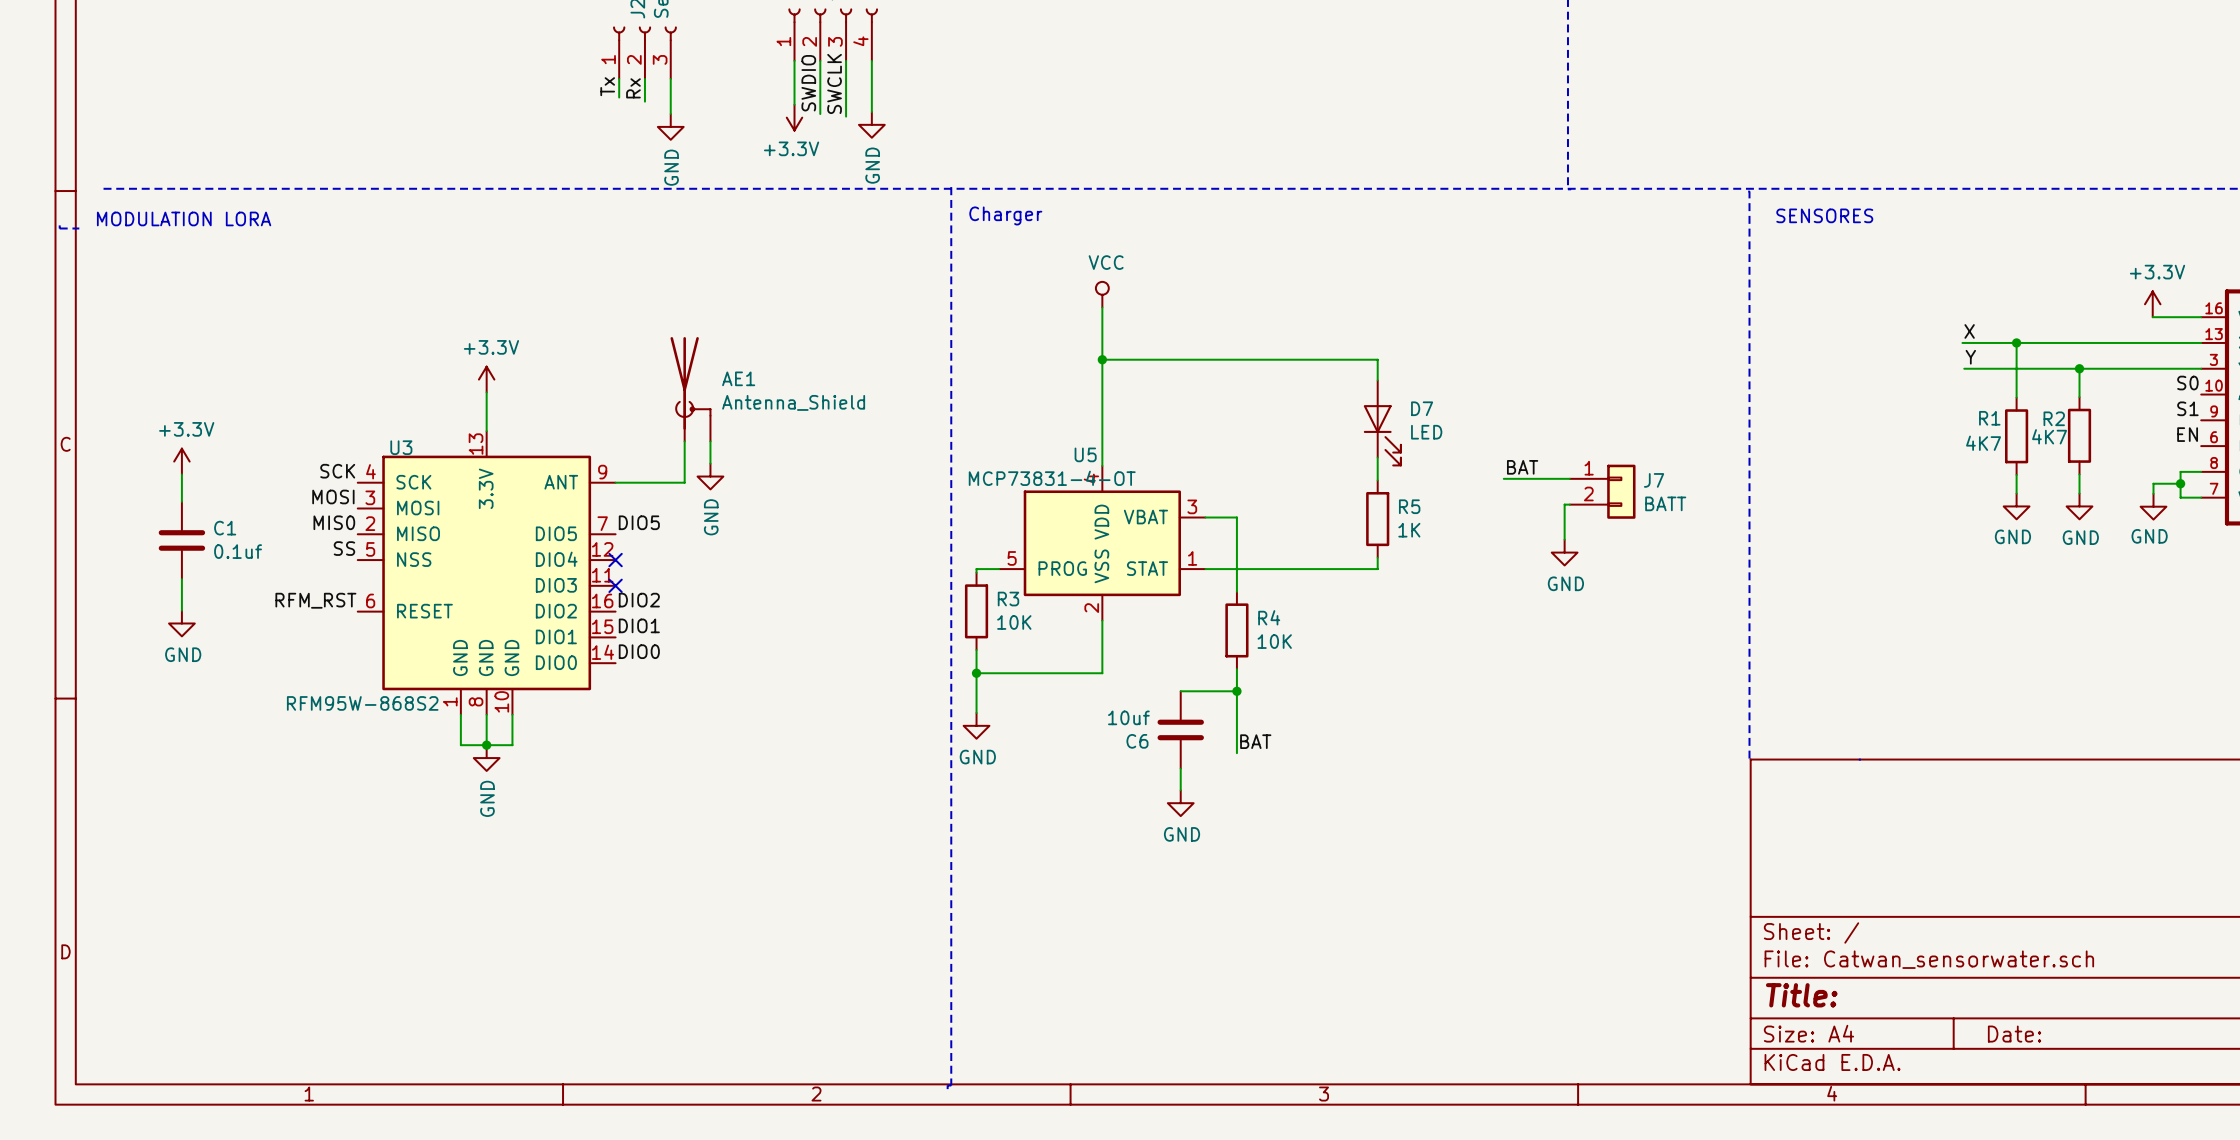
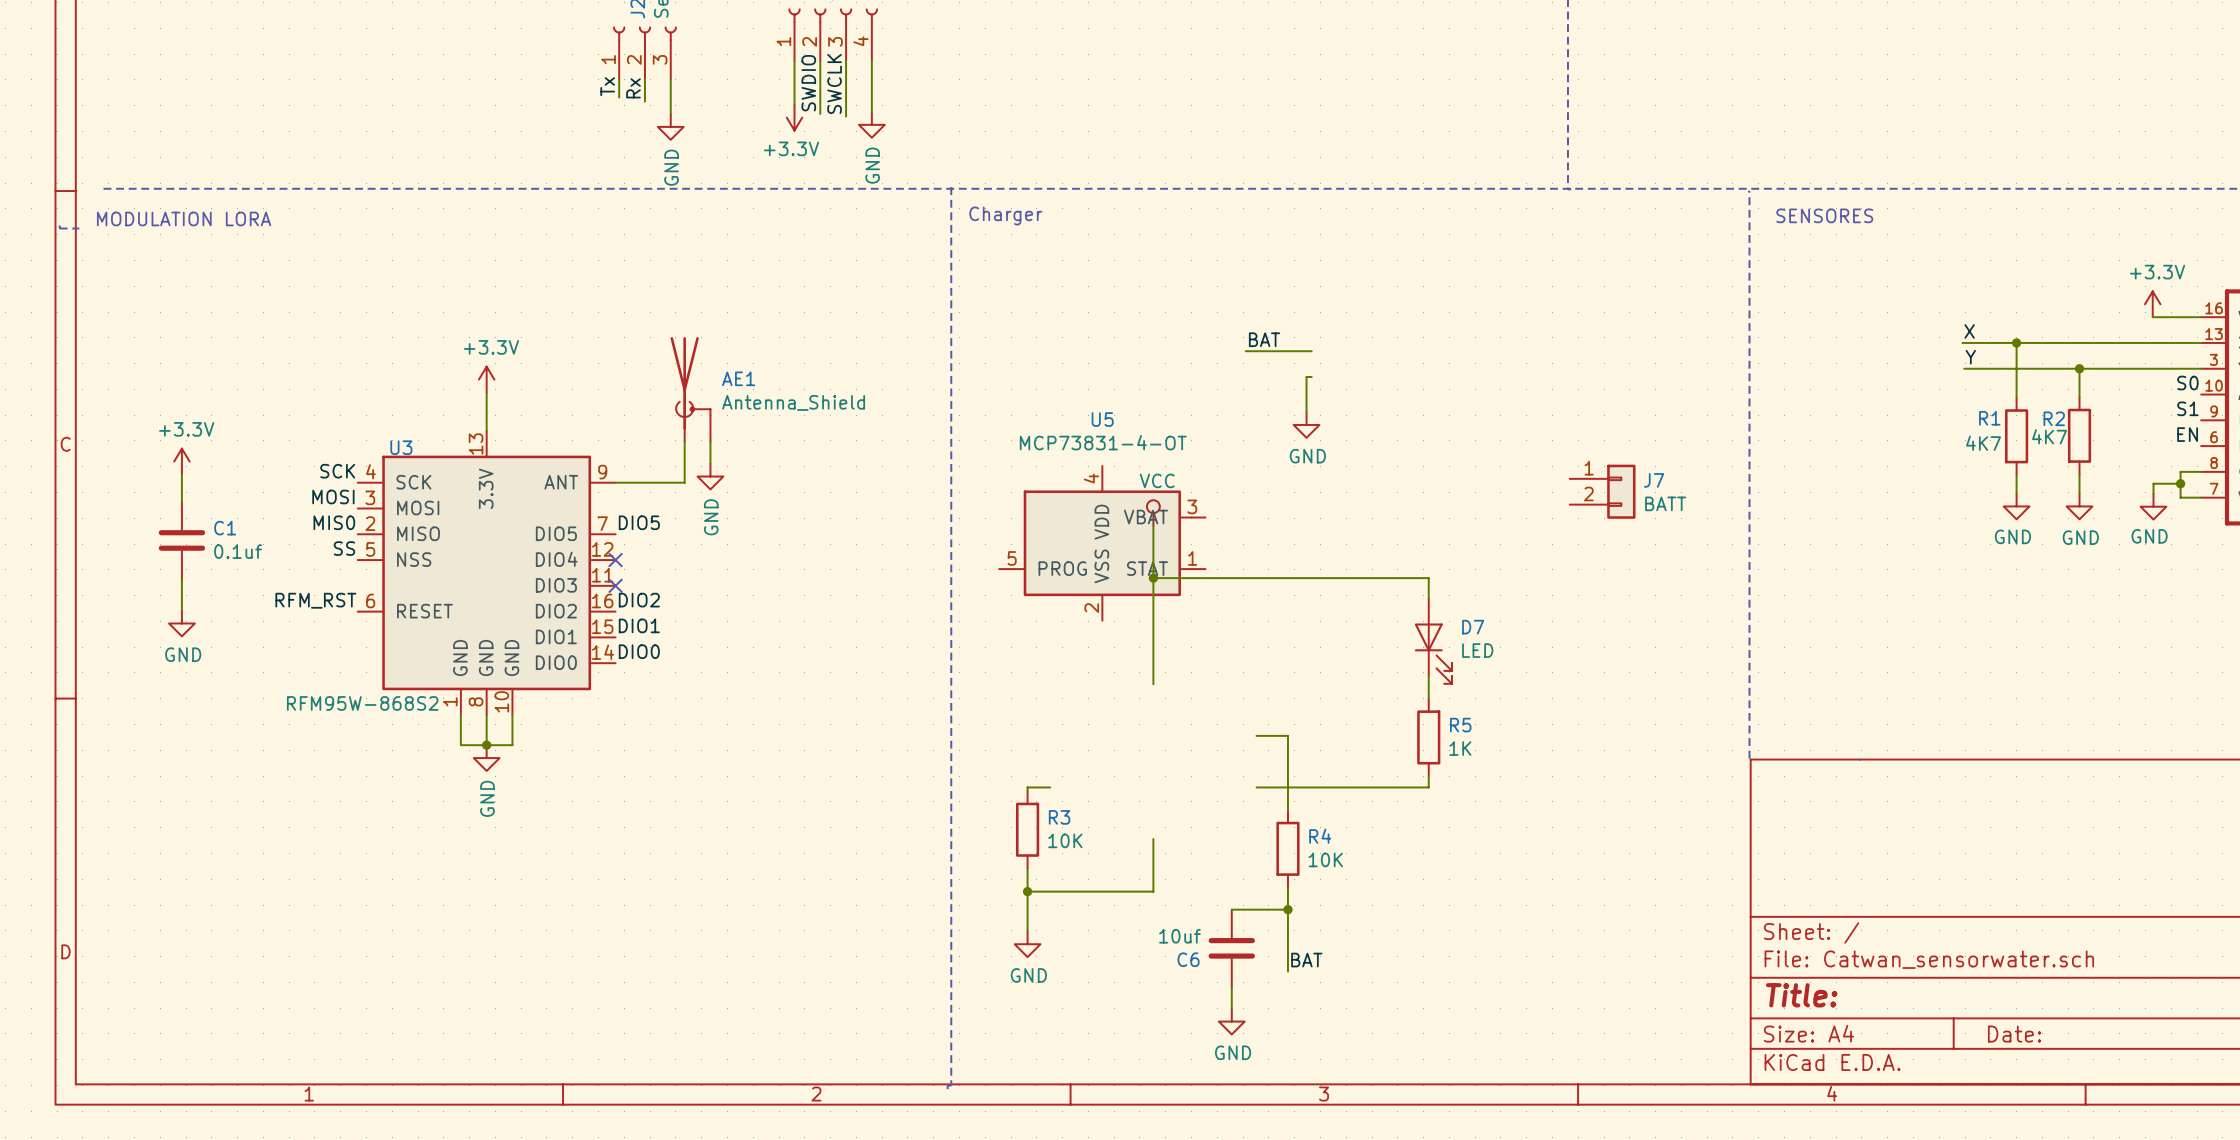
power symbol position: VCC (1102, 294) -> VCC (1153, 513)
wire: (1102, 307) (1102, 465) -> (1153, 526) (1153, 684)
label: none -> BAT (1264, 339)
wire: none -> (1245, 351) (1311, 351)
wire: (1102, 359) (1377, 359) (1377, 380) -> (1153, 578) (1428, 578) (1428, 598)
junction: (1102, 359) -> none
wire: none -> (1311, 377) (1306, 377) (1306, 412)
D7 position: (1382, 422) -> (1433, 641)
power symbol: none -> GND (1306, 424)
U5 name position: U5 (1085, 454) -> U5 (1102, 419)
wire: (1377, 457) (1377, 480) -> (1428, 676) (1428, 698)
label: BAT (1522, 467) -> none
U5 value position: MCP73831-4-OT (1052, 478) -> MCP73831-4-OT (1103, 442)
wire: (1503, 478) (1569, 478) -> none
wire: (1569, 504) (1564, 504) (1564, 539) -> none
wire: (1205, 517) (1236, 517) (1236, 591) -> (1256, 735) (1287, 735) (1287, 810)
R5 position: (1377, 519) -> (1428, 737)
power symbol: GND (1564, 552) -> none
wire: (1377, 557) (1377, 569) (1205, 569) -> (1428, 776) (1428, 787) (1256, 787)
wire: (999, 569) (976, 569) (976, 572) -> (1050, 787) (1027, 787) (1027, 791)
junction: none -> (1153, 578)
R3 position: (976, 611) -> (1027, 829)
wire: (1102, 620) (1102, 673) (976, 673) -> (1153, 839) (1153, 891) (1027, 891)
R4 position: (1236, 630) -> (1287, 848)
wire: (976, 650) (976, 712) -> (1027, 868) (1027, 931)
wire: (1236, 669) (1236, 753) -> (1287, 887) (1287, 971)
junction: (976, 673) -> none
wire: (1180, 691) (1236, 691) -> (1231, 909) (1287, 909)
junction: (1236, 691) -> none
power symbol: GND (976, 725) -> none
C6 position: (1180, 729) -> (1231, 948)
label: BAT (1255, 741) -> none
wire: (1180, 768) (1180, 790) -> (1231, 987) (1231, 1008)
power symbol: GND (1180, 803) -> none
junction: none -> (1027, 891)
junction: none -> (1287, 909)
power symbol: none -> GND (1027, 944)
label: none -> BAT (1306, 960)
power symbol: none -> GND (1231, 1021)

